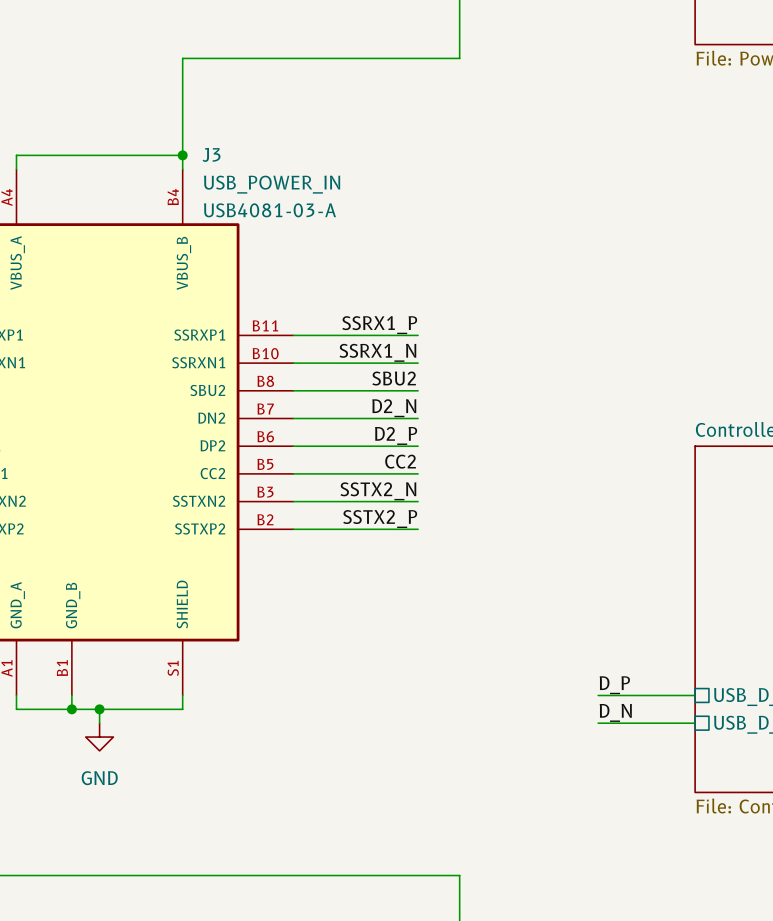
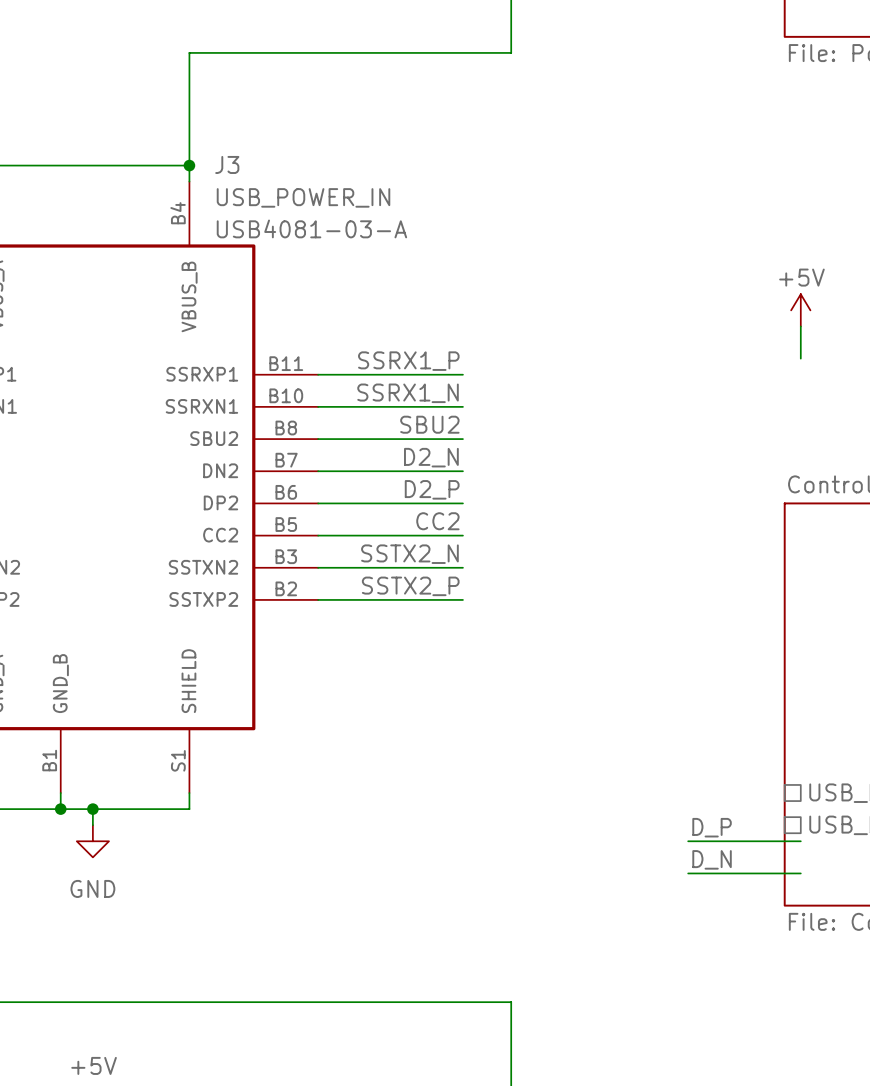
power symbol: none -> +5V (800, 310)
wire: none -> (800, 326) (800, 358)
label position: D_P (614, 685) -> D_P (712, 827)
wire: (598, 695) (695, 695) -> (688, 841) (800, 841)
label position: D_N (615, 712) -> D_N (712, 859)
wire: (598, 723) (695, 723) -> (688, 873) (800, 873)

